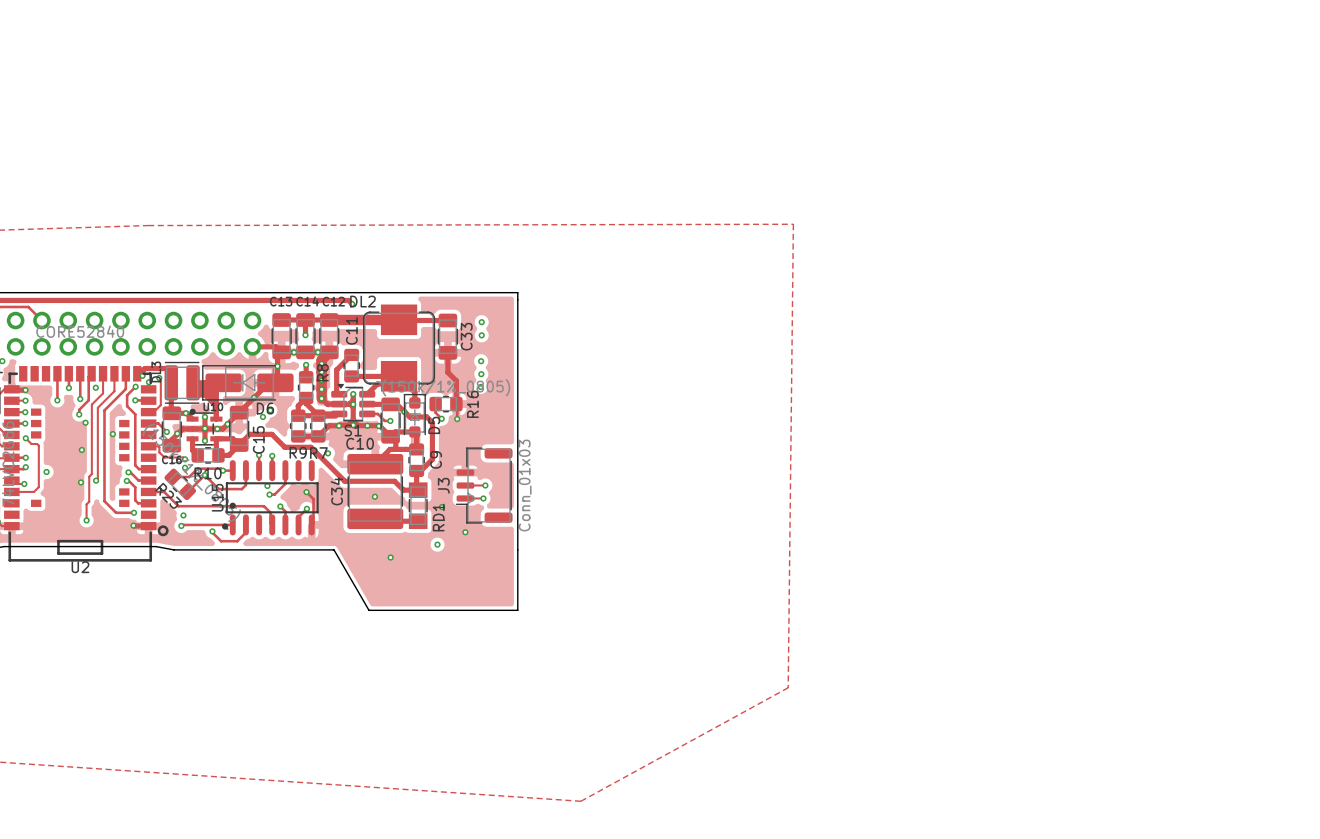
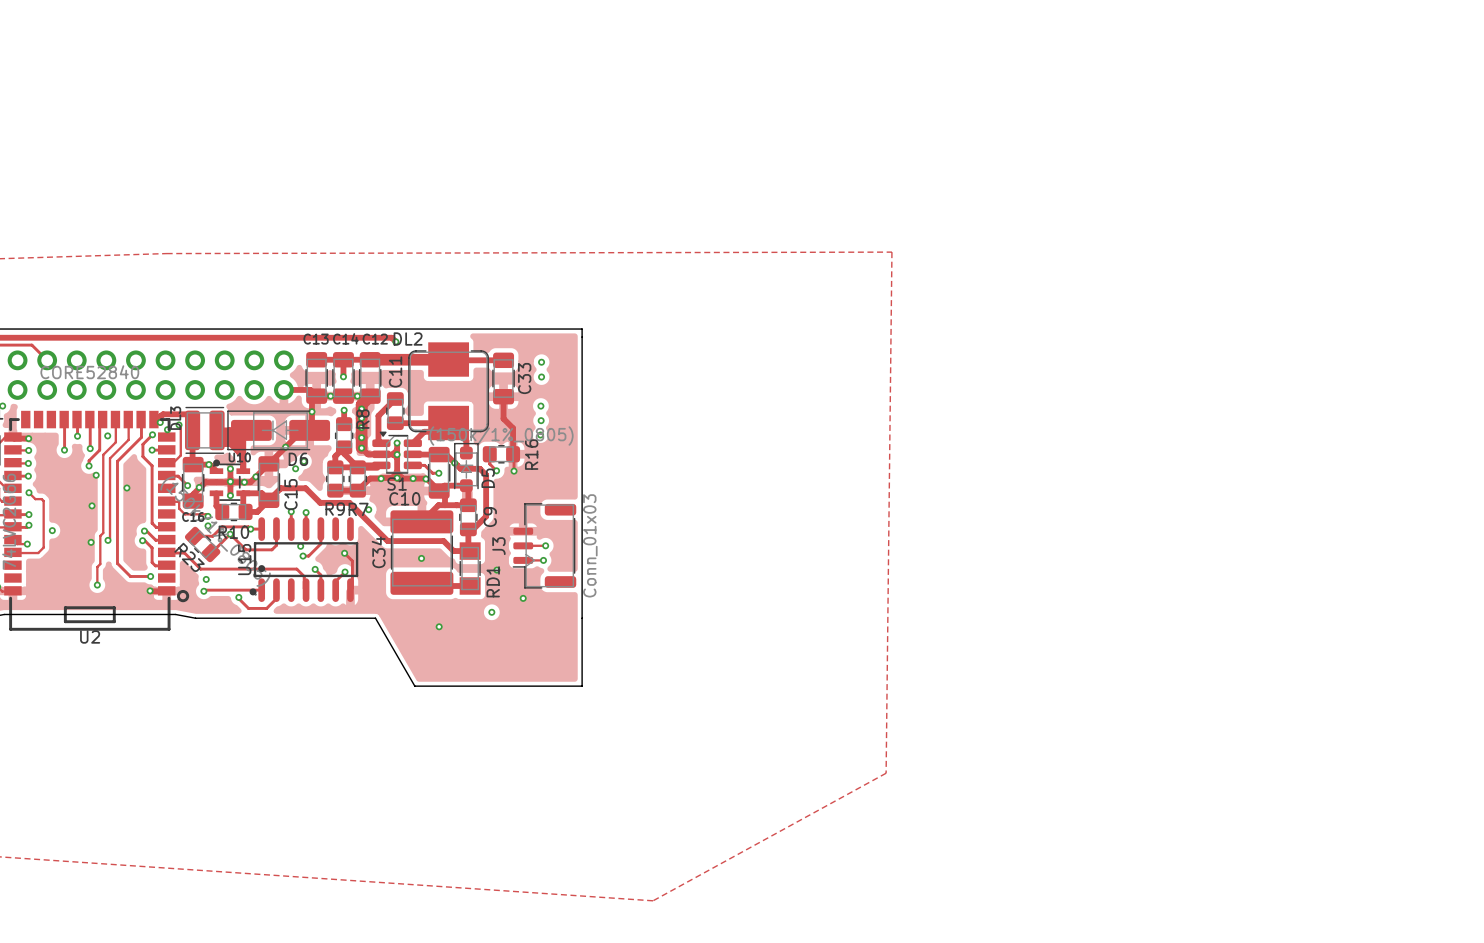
U2 footprint: [4, 366, 169, 562] -> [4, 410, 190, 631]

